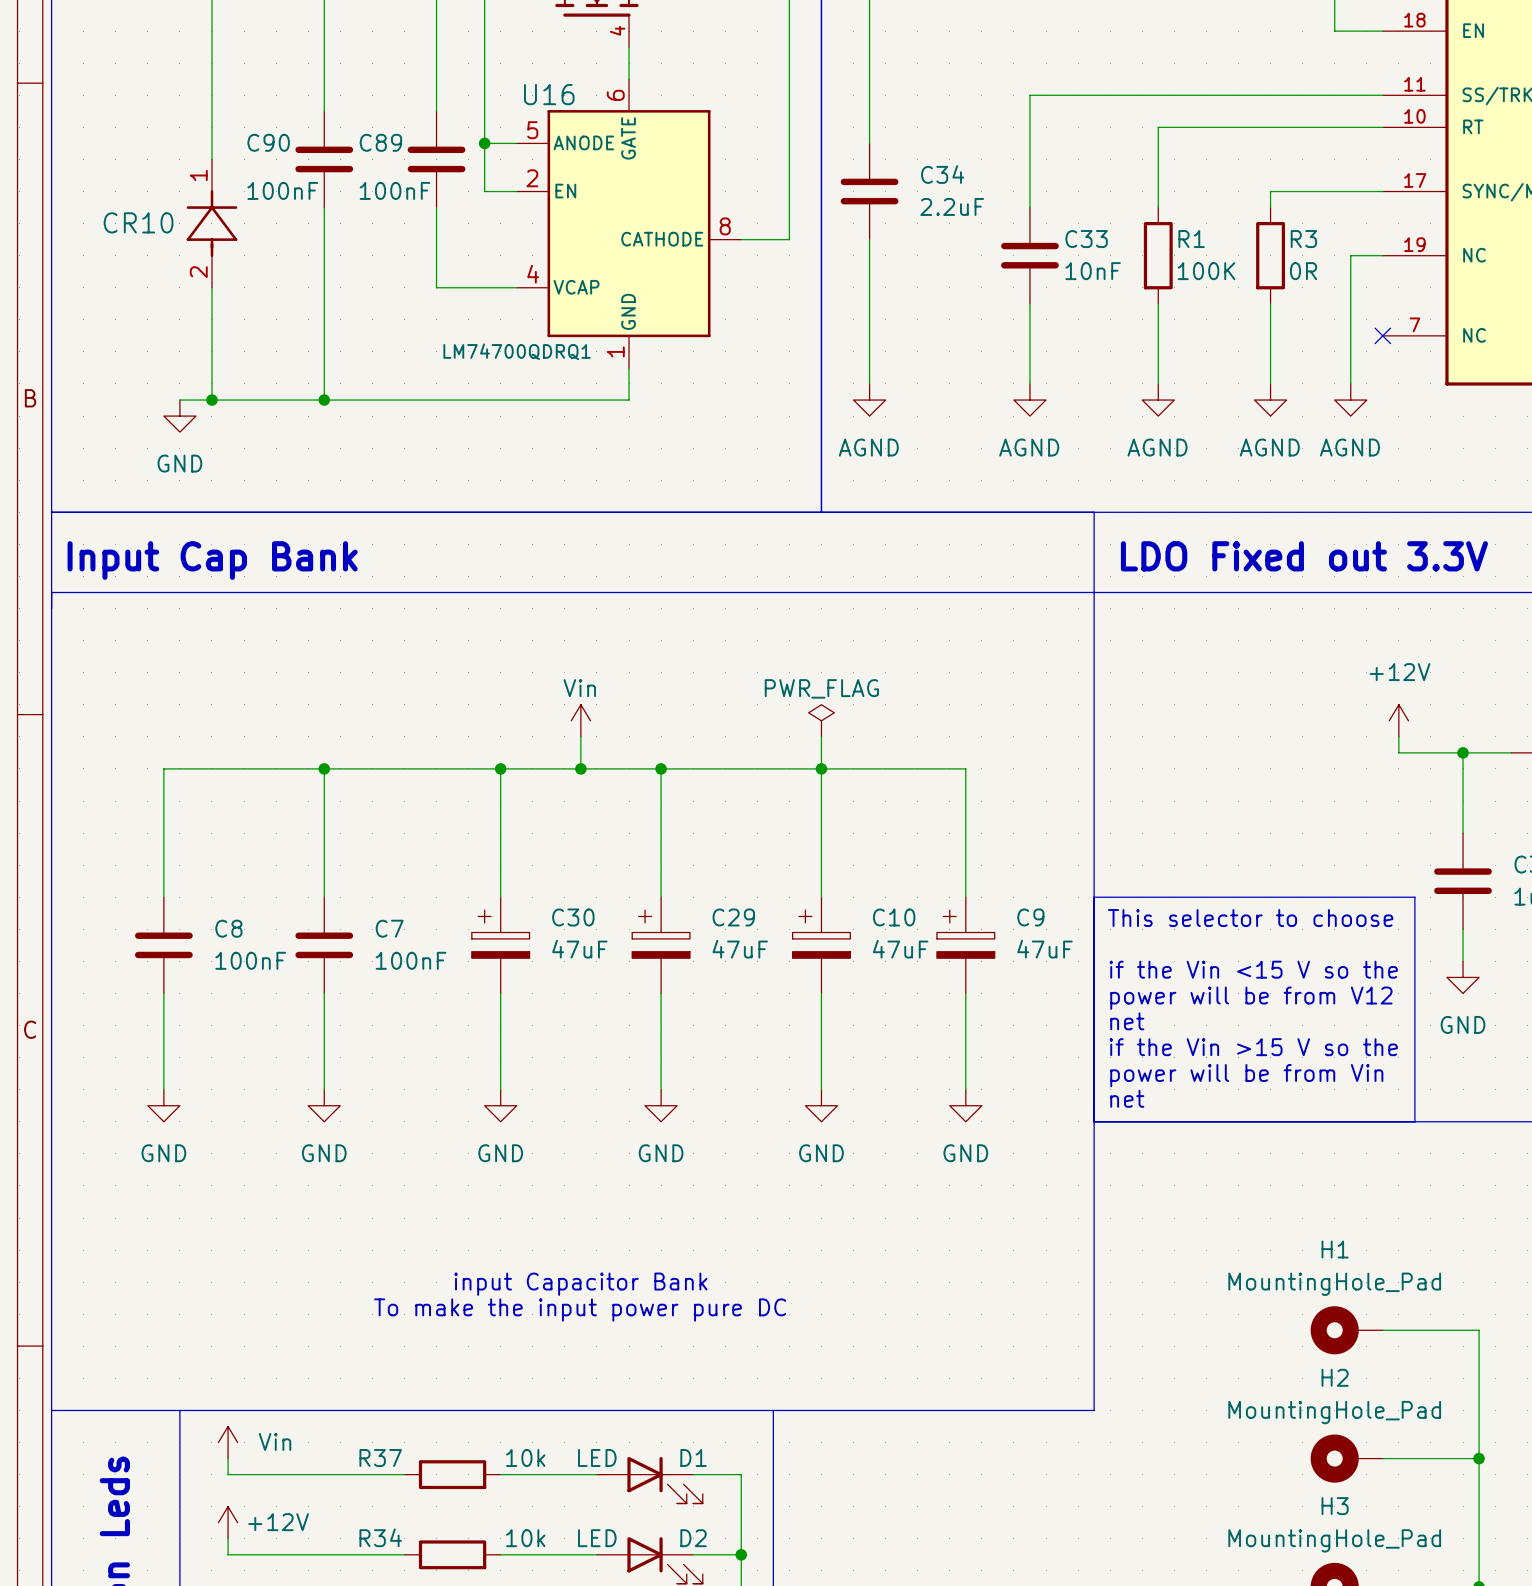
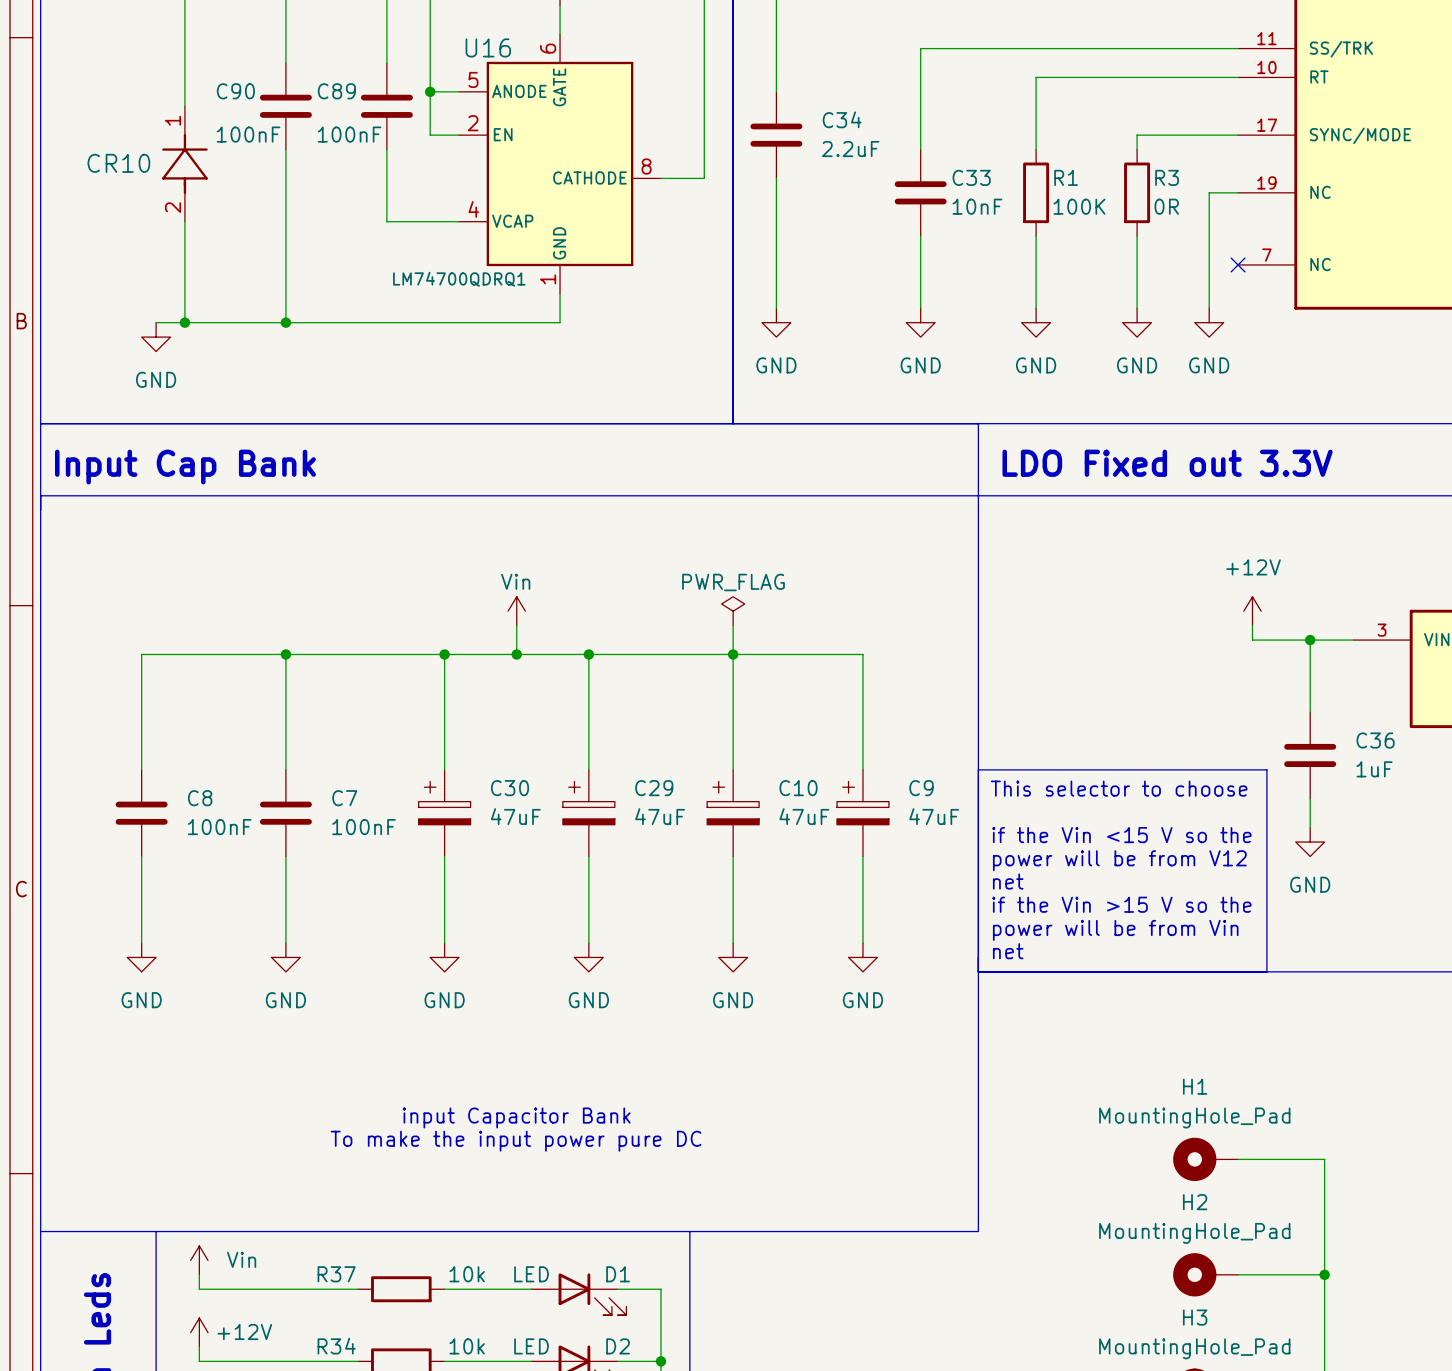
power symbol: AGND (869, 400) -> GND (776, 322)
power symbol: AGND (1029, 400) -> GND (920, 322)
power symbol: AGND (1158, 400) -> GND (1036, 322)
power symbol: AGND (1270, 400) -> GND (1137, 322)
power symbol: AGND (1350, 400) -> GND (1209, 322)

